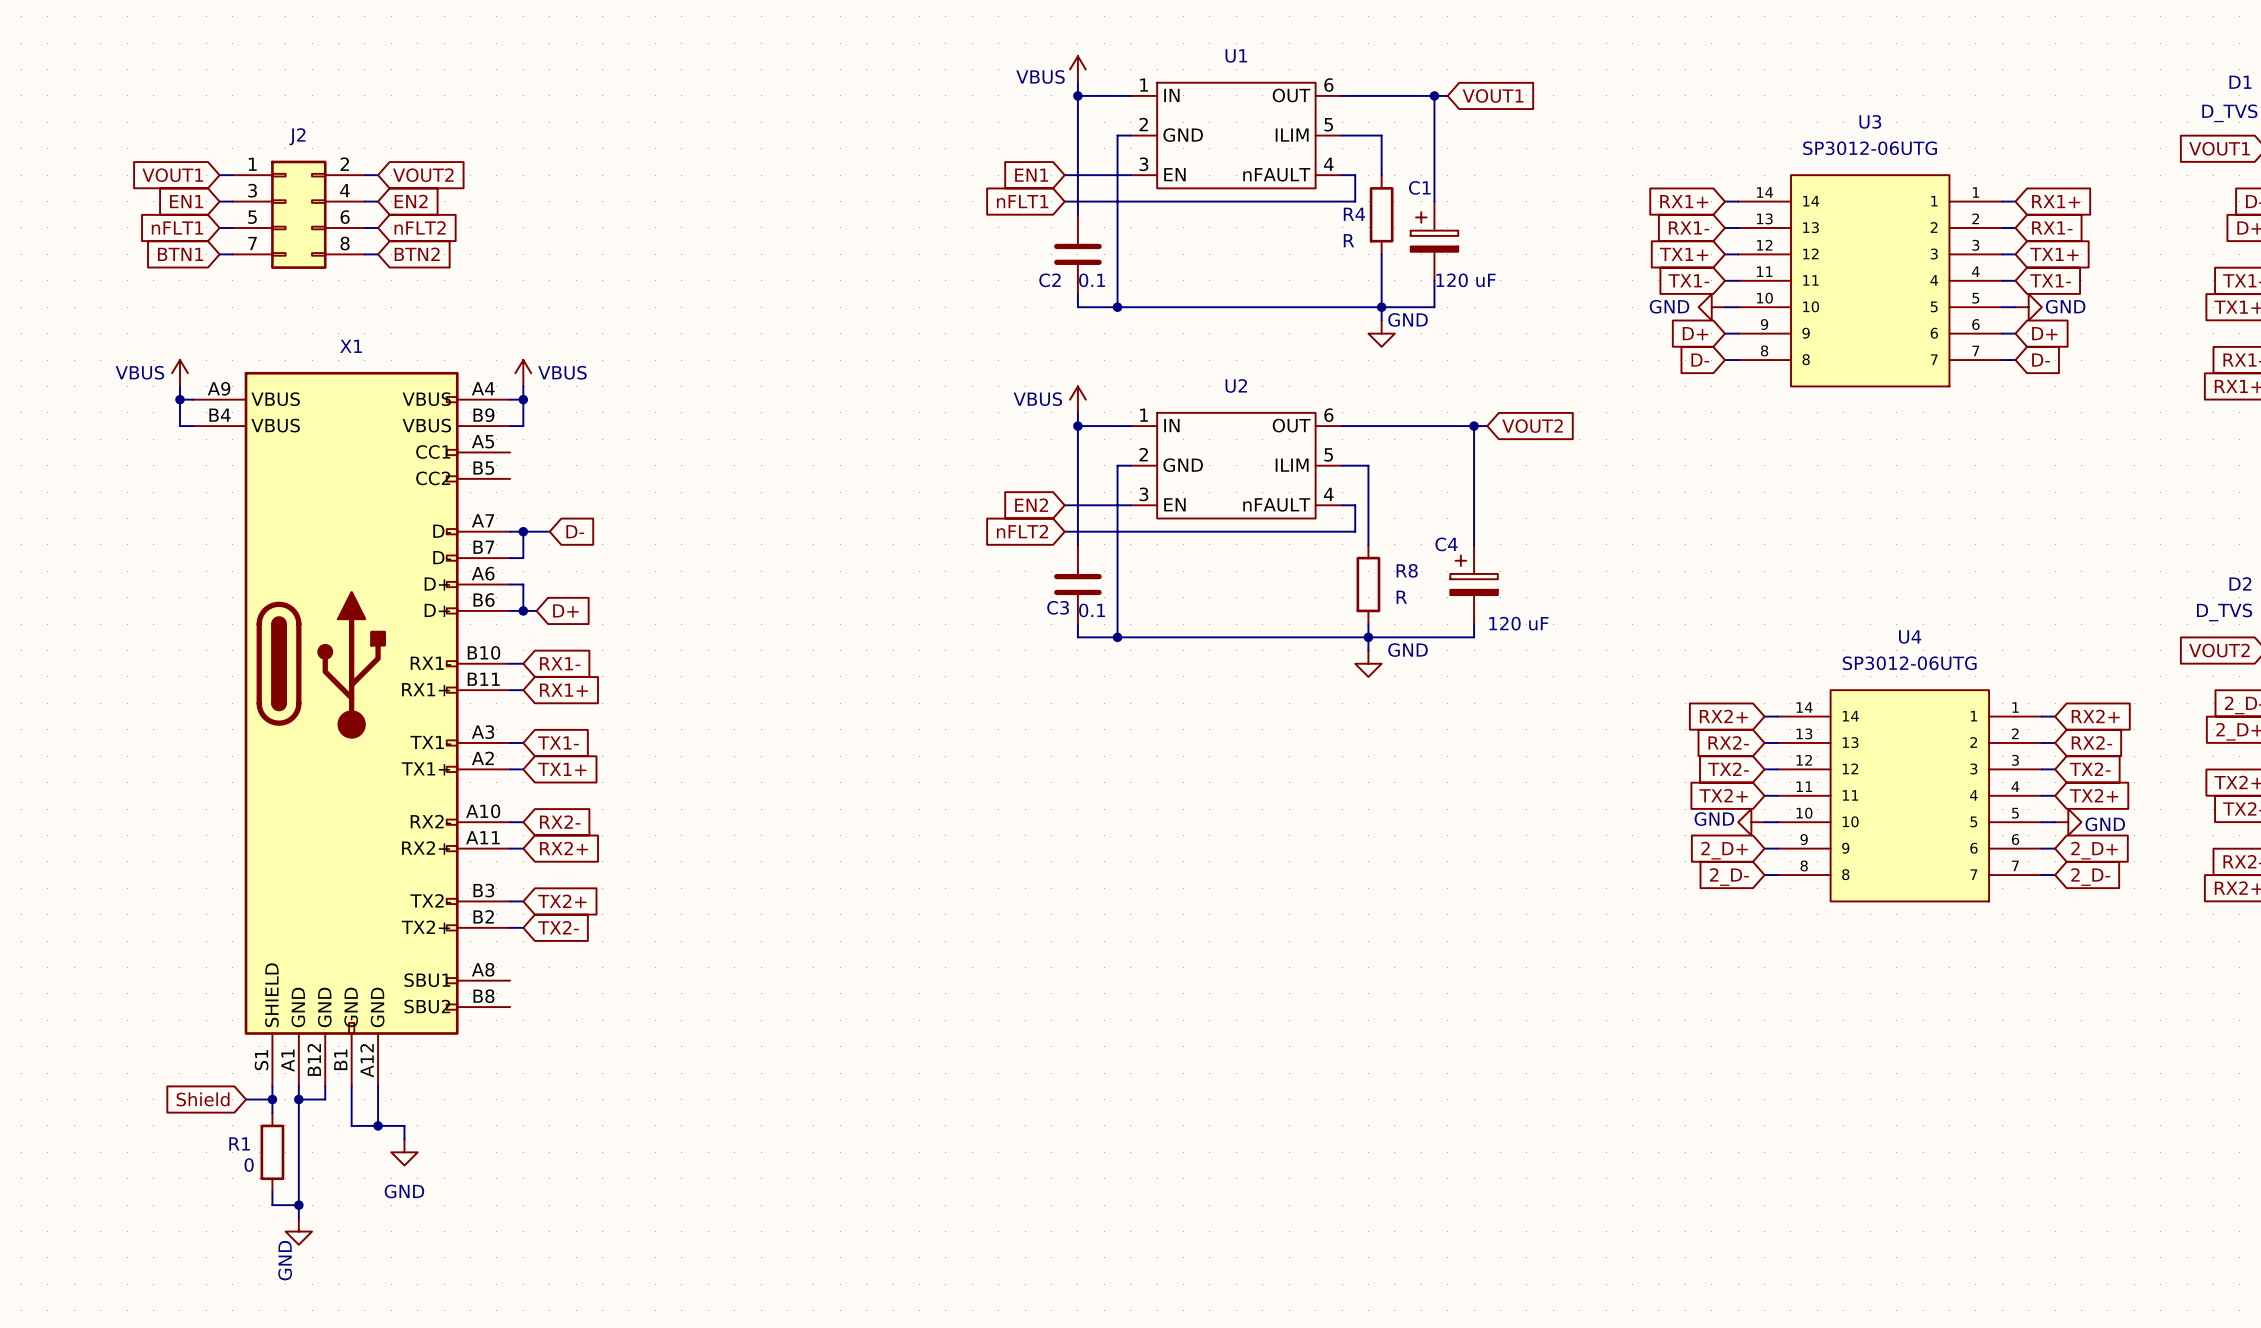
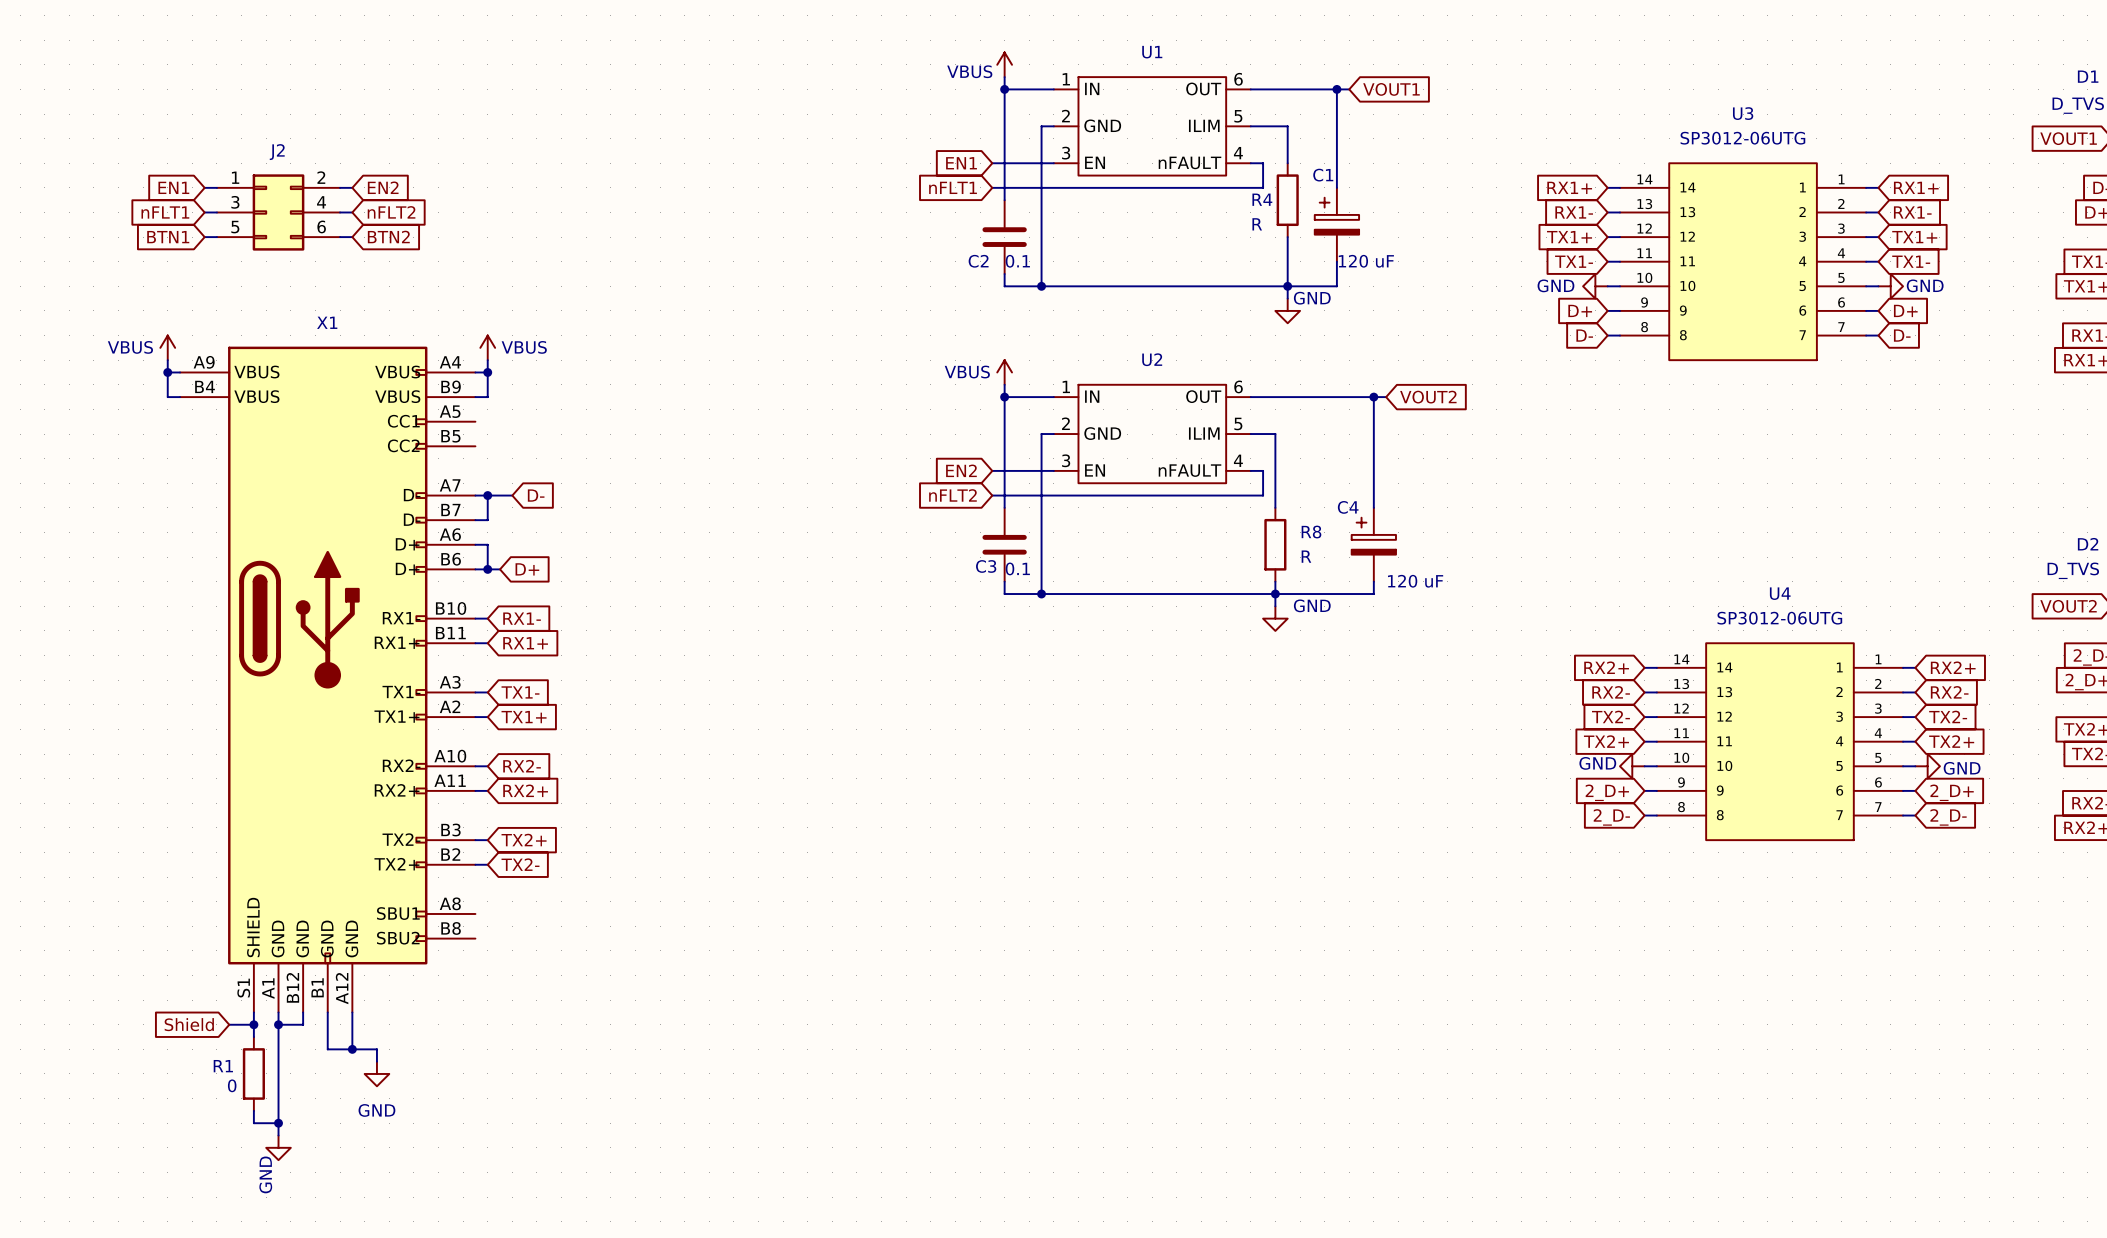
J2 symbol: [232, 160, 365, 269] -> [216, 174, 341, 251]
global label: VOUT1 (172, 175) -> none
wire: (219, 175) (232, 175) -> none
wire: (364, 175) (378, 175) -> none
global label: VOUT2 (423, 175) -> none

